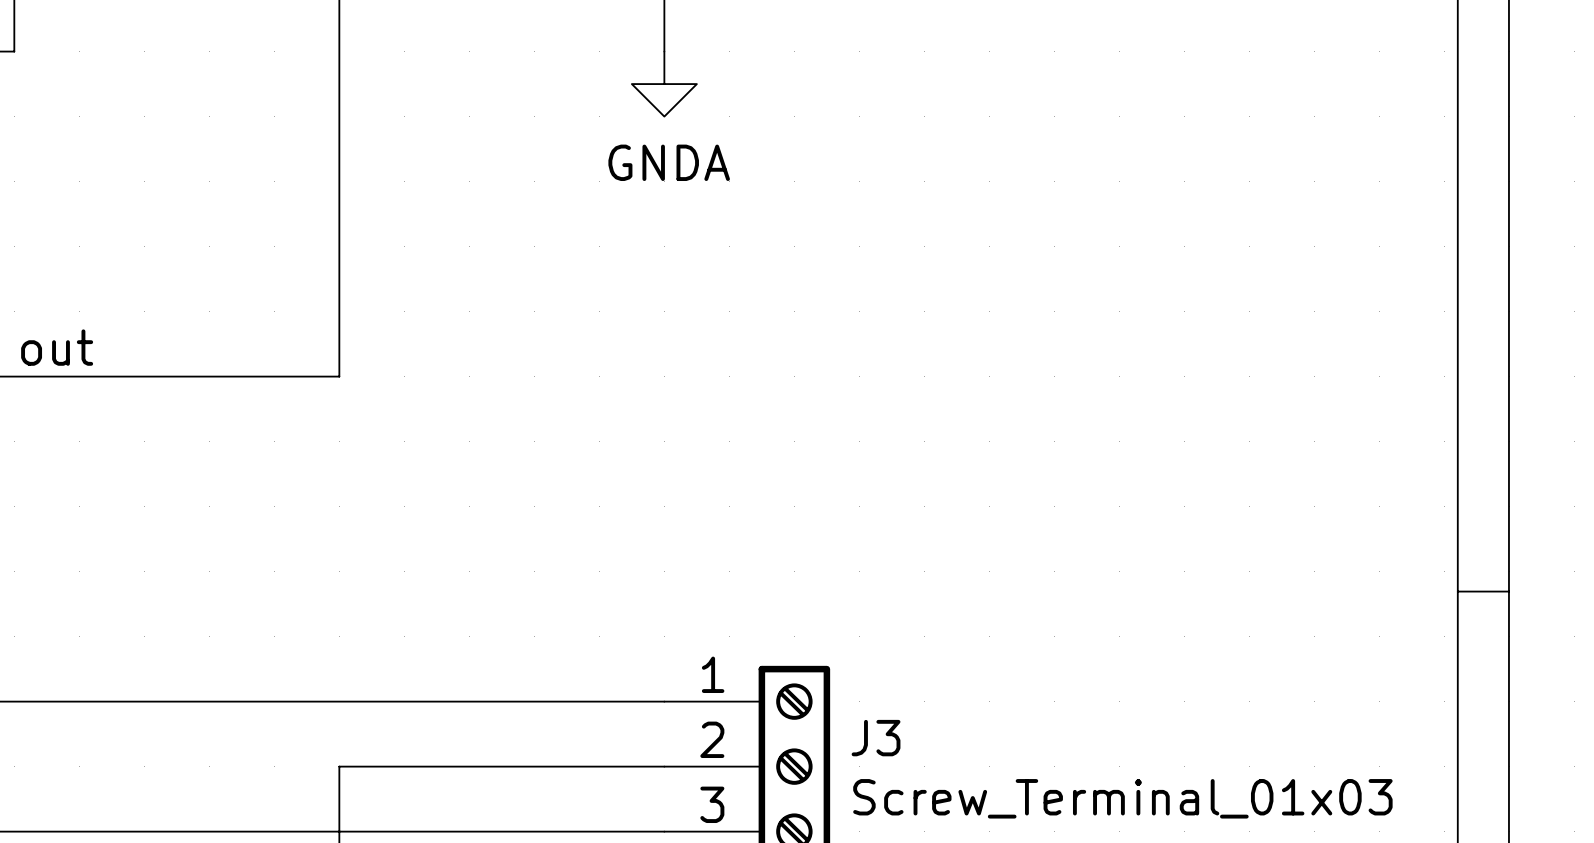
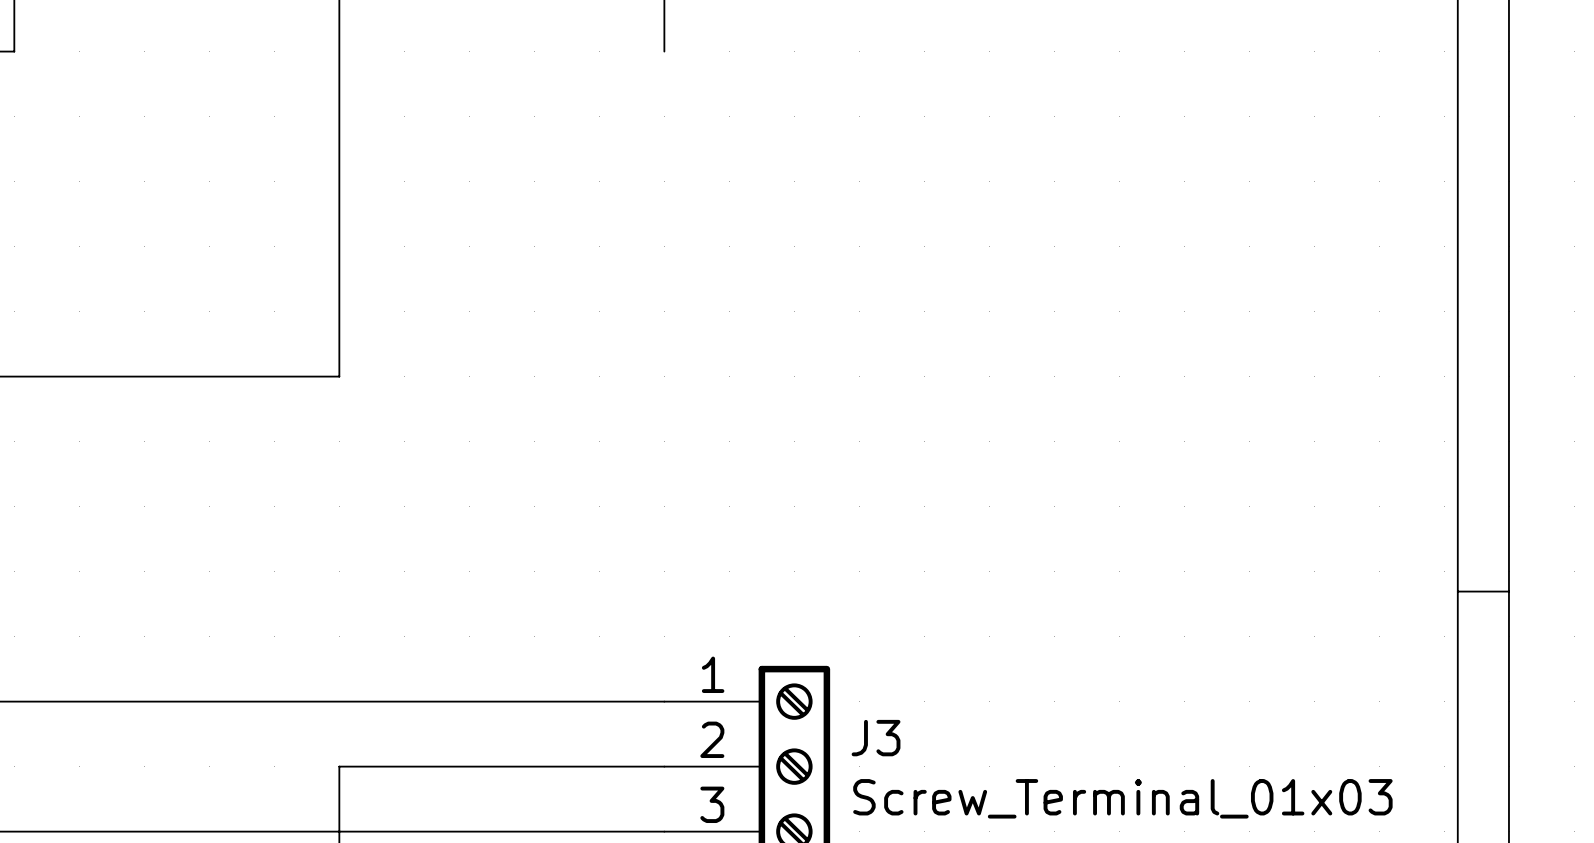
power symbol: GNDA (664, 84) -> none
label: out (57, 347) -> none

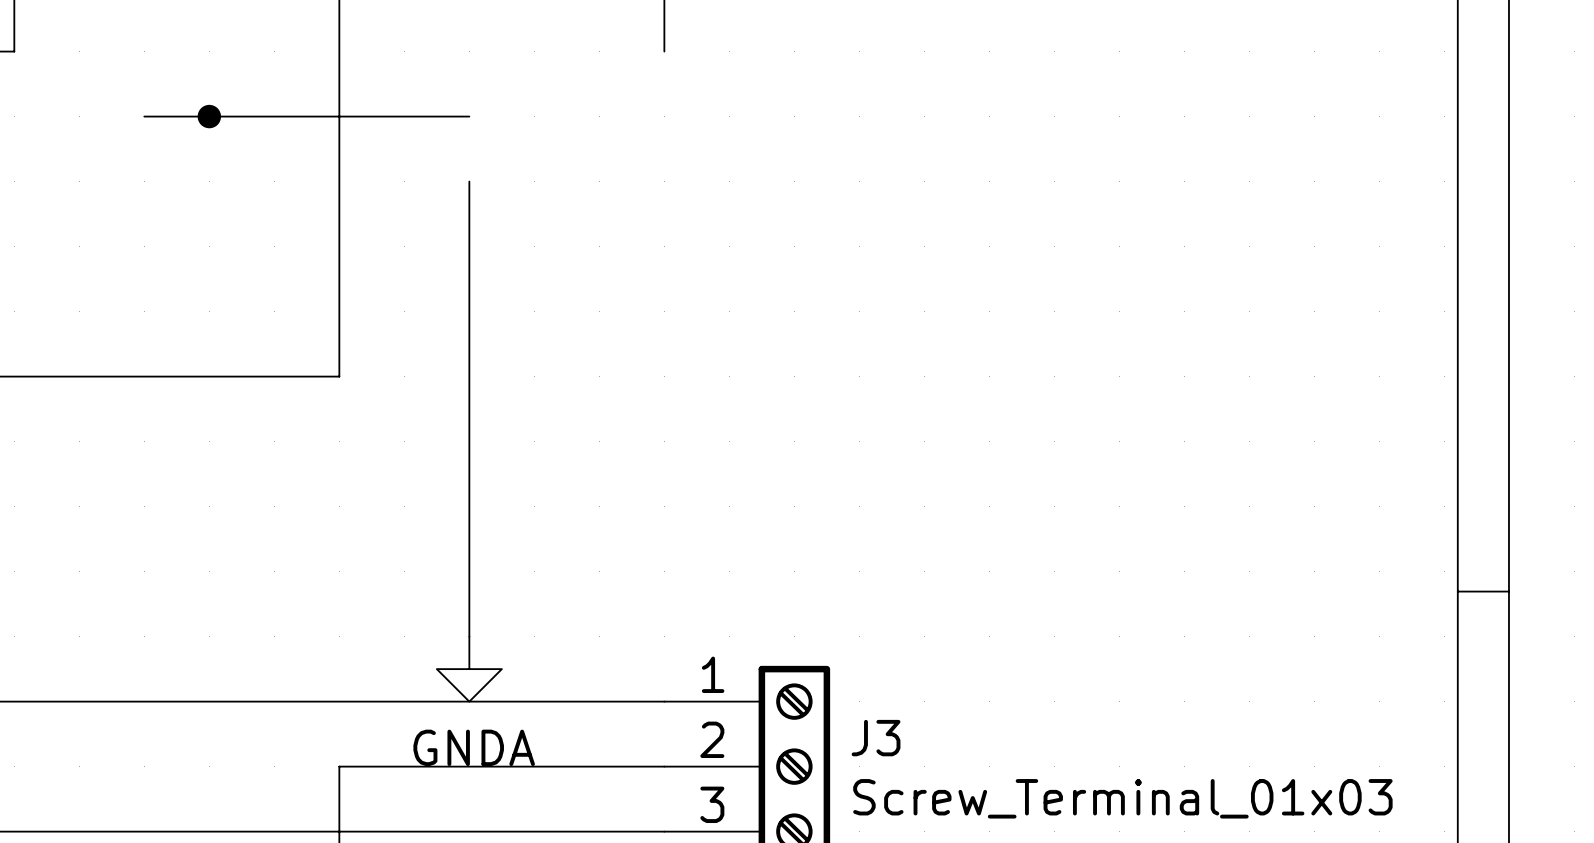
wire: none -> (144, 116) (469, 116)
junction: none -> (209, 116)
wire: none -> (469, 181) (469, 636)
power symbol: none -> GNDA (469, 669)

